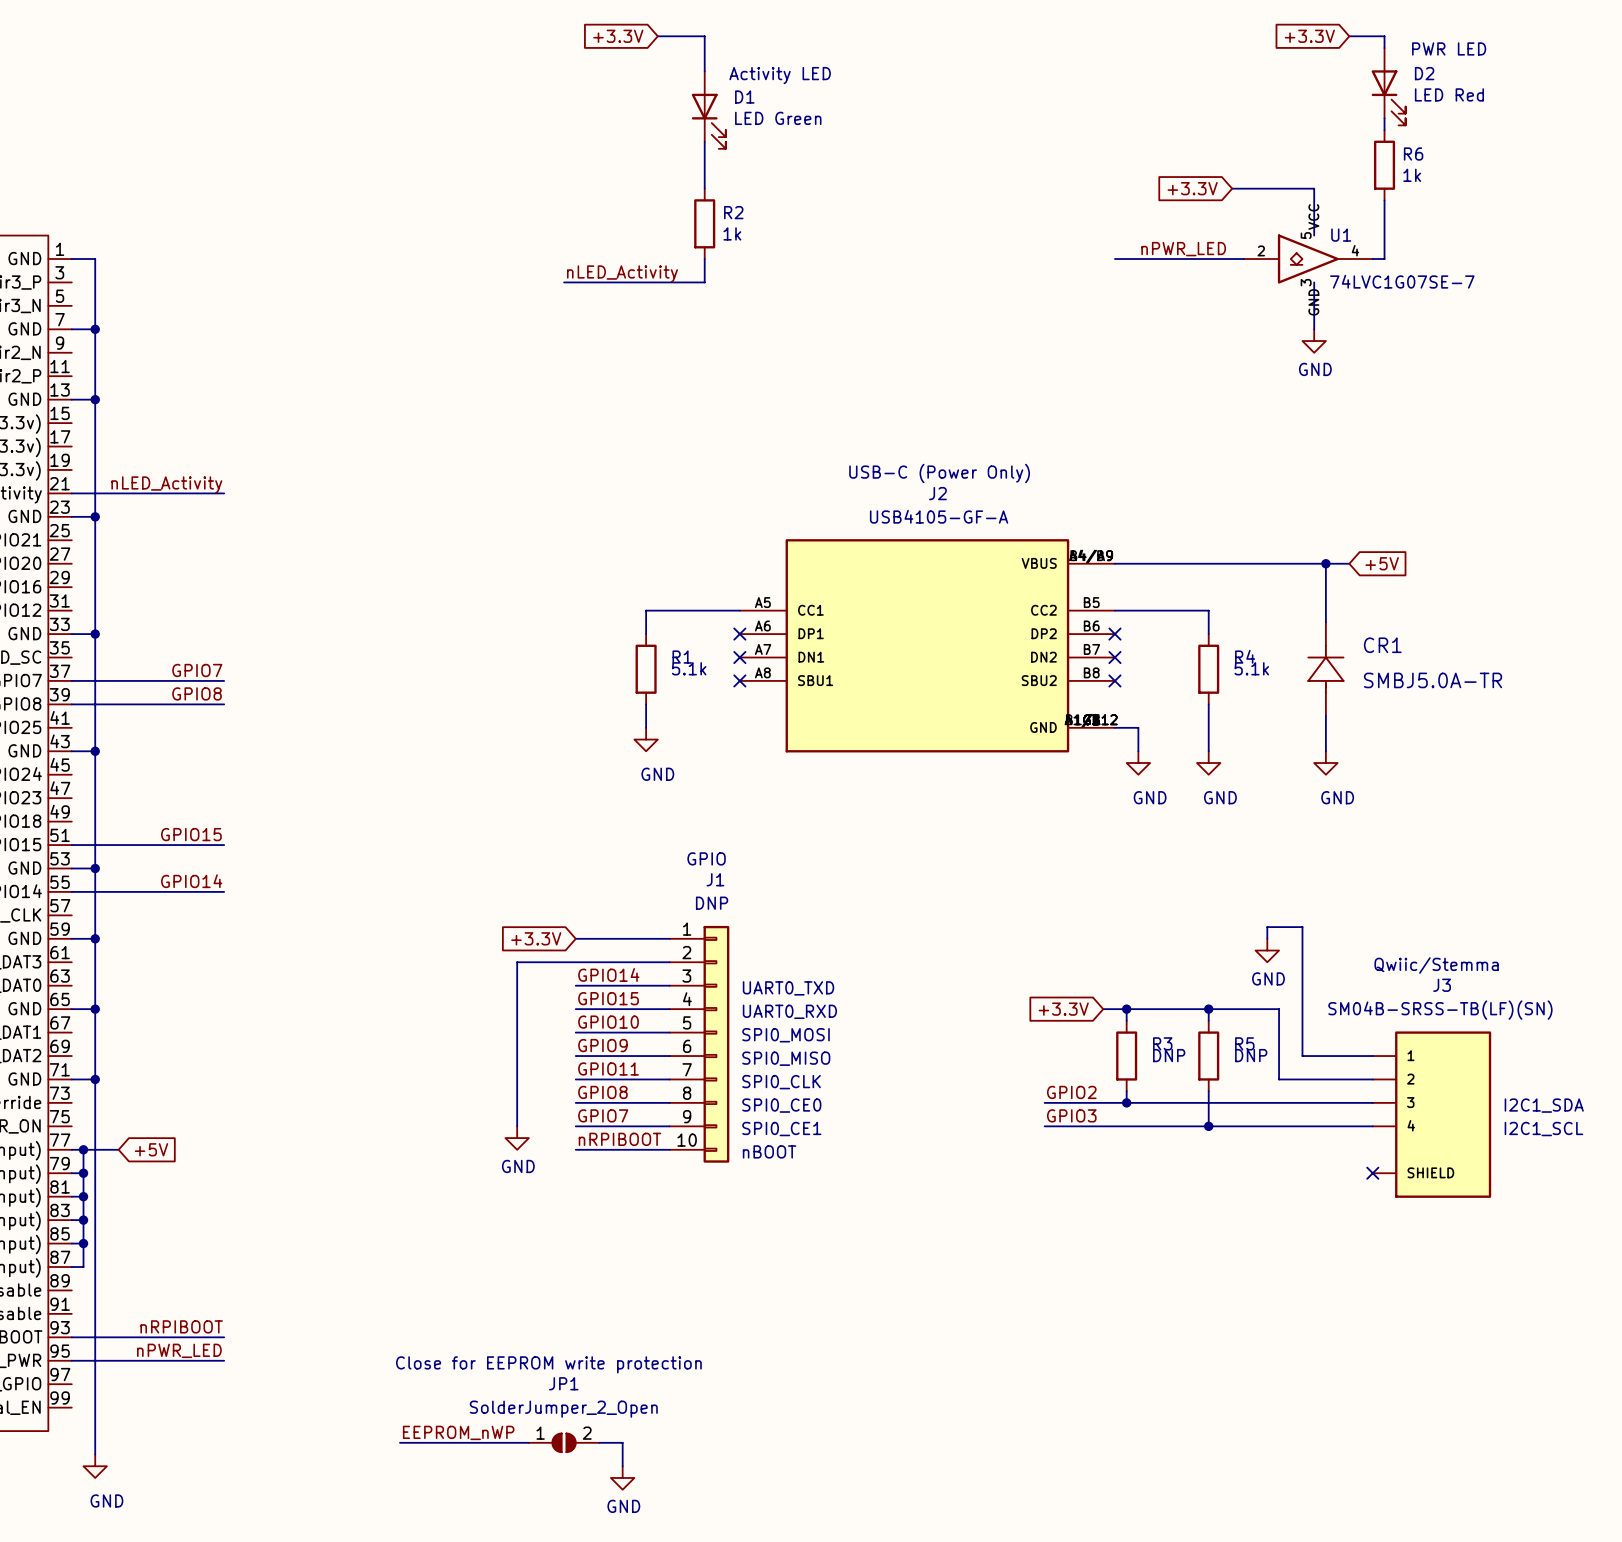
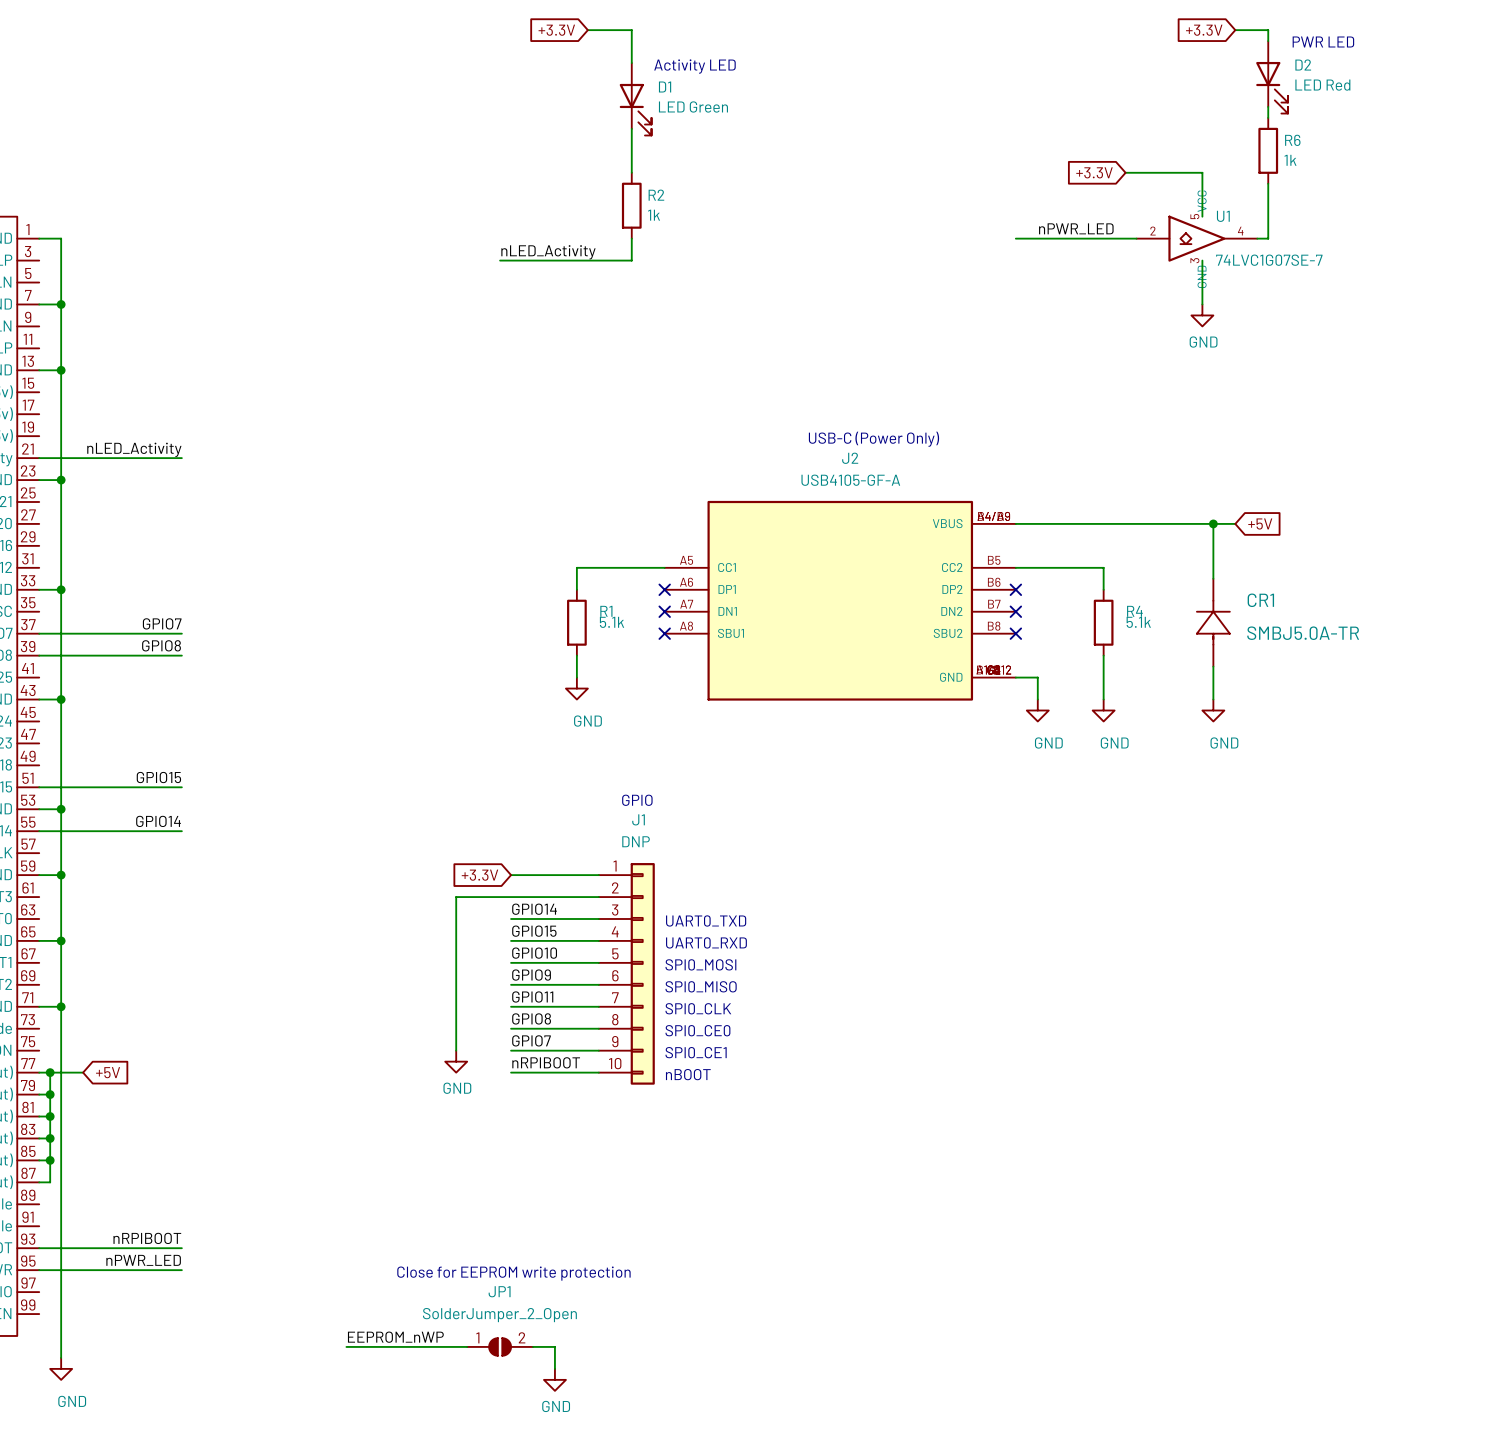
wire: (1267, 938) (1267, 927) (1302, 927) (1302, 1056) (1372, 1056) -> none
power symbol: GND (1267, 950) -> none
text: Qwiic/Stemma (1436, 965) -> none
global label: +3.3V (1063, 1009) -> none
wire: (1103, 1009) (1279, 1009) (1279, 1079) (1372, 1079) -> none
wire: (1126, 1009) (1126, 1020) -> none
junction: (1126, 1009) -> none
wire: (1208, 1009) (1208, 1020) -> none
junction: (1208, 1009) -> none
R3: DNP (1126, 1056) -> none
R5: DNP (1208, 1056) -> none
wire: (1126, 1091) (1126, 1102) -> none
wire: (1208, 1091) (1208, 1126) -> none
label: GPIO2 (1071, 1092) -> none
wire: (1044, 1102) (1372, 1102) -> none
junction: (1126, 1102) -> none
text: I2C1_SDA (1544, 1105) -> none
J3: SM04B-SRSS-TB(LF)(SN) (1432, 1114) -> none
label: GPIO3 (1071, 1115) -> none
wire: (1044, 1126) (1372, 1126) -> none
junction: (1208, 1126) -> none
text: I2C1_SCL (1543, 1129) -> none
no-connect mark: (1372, 1173) -> none

